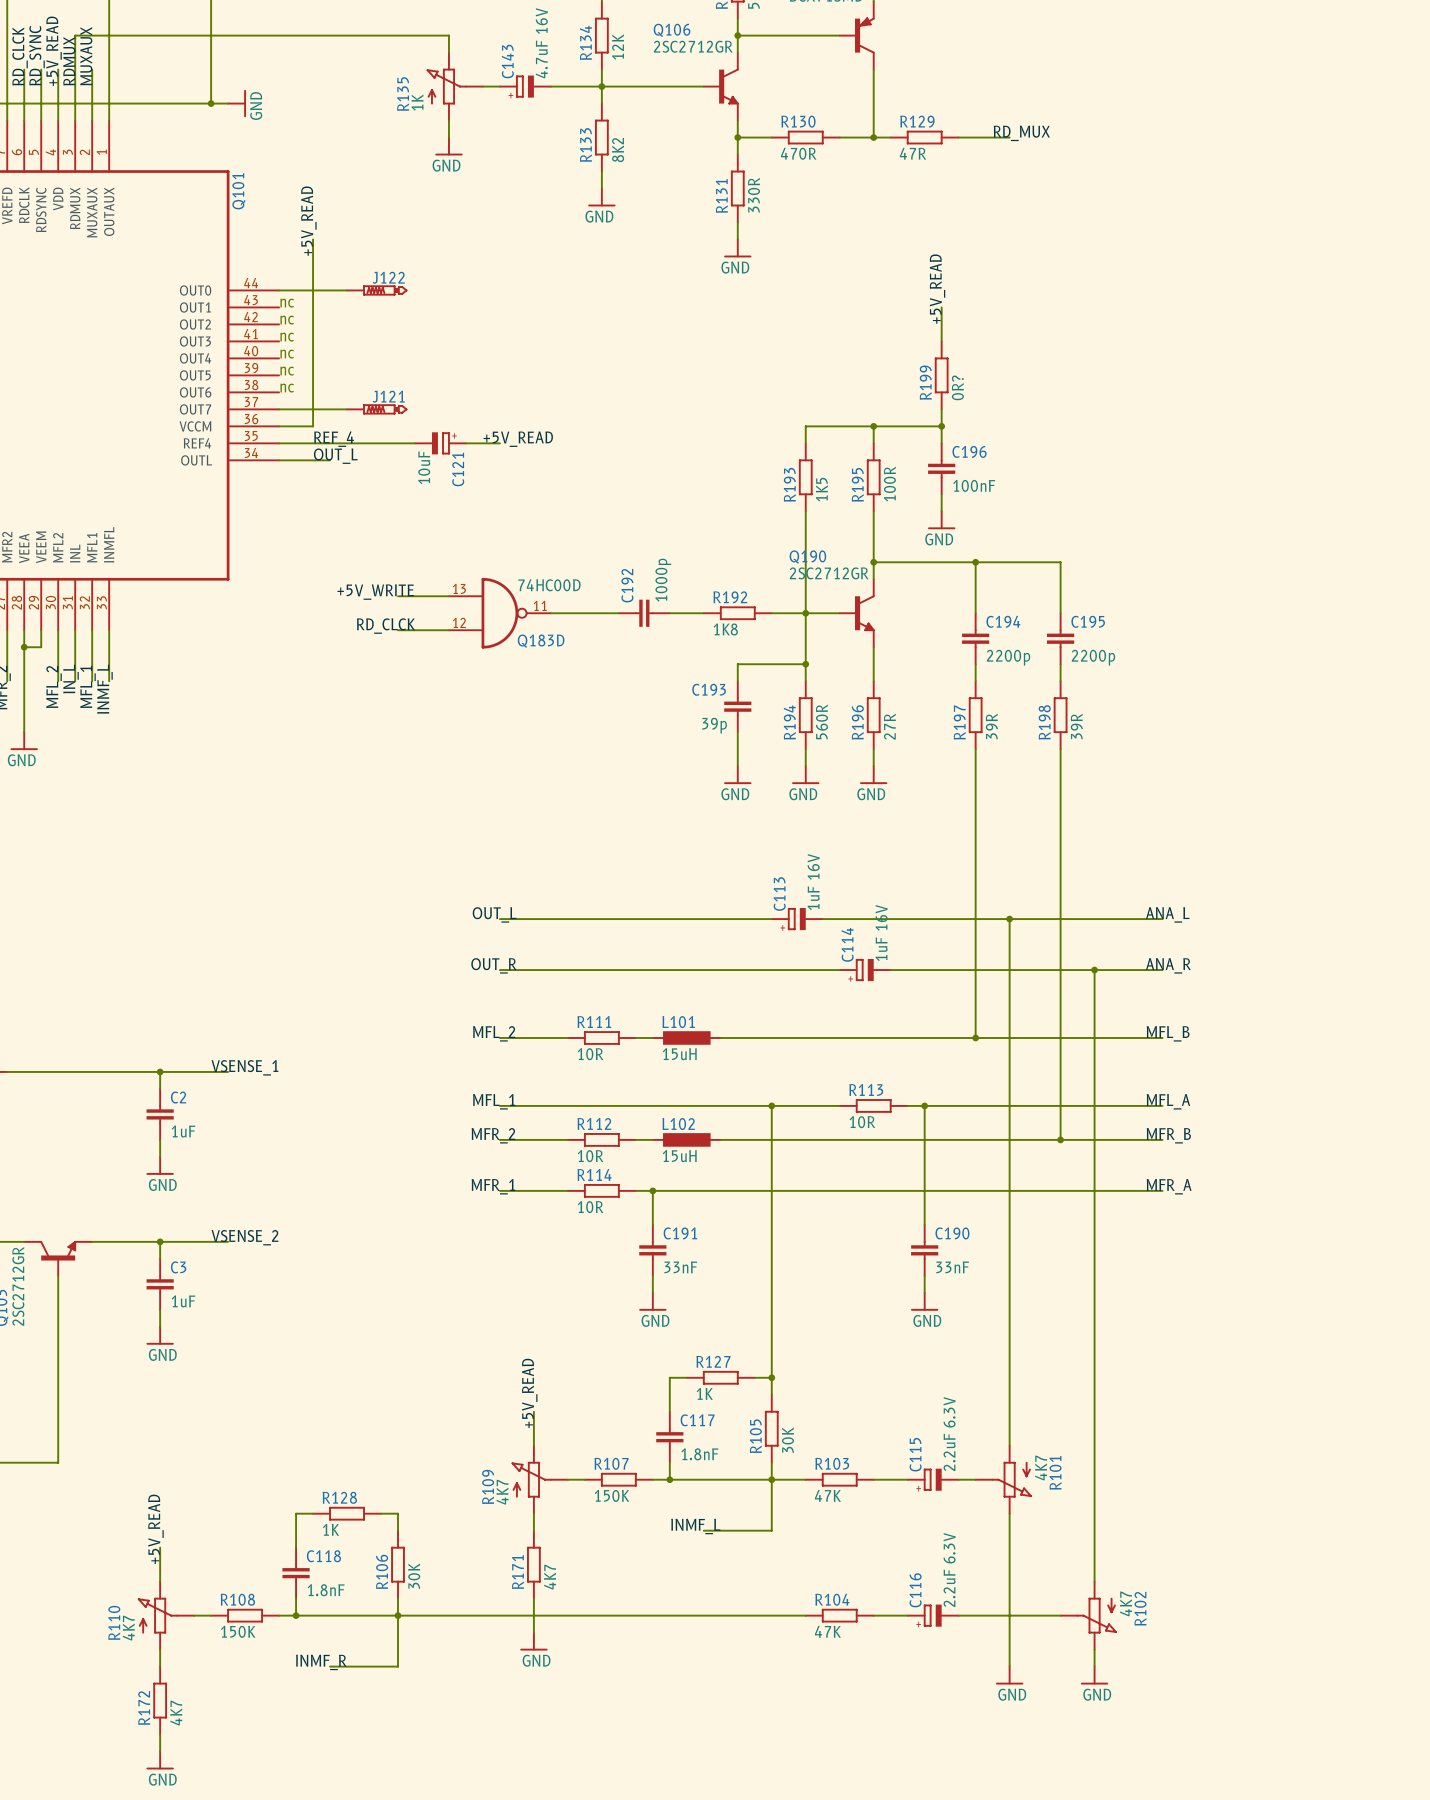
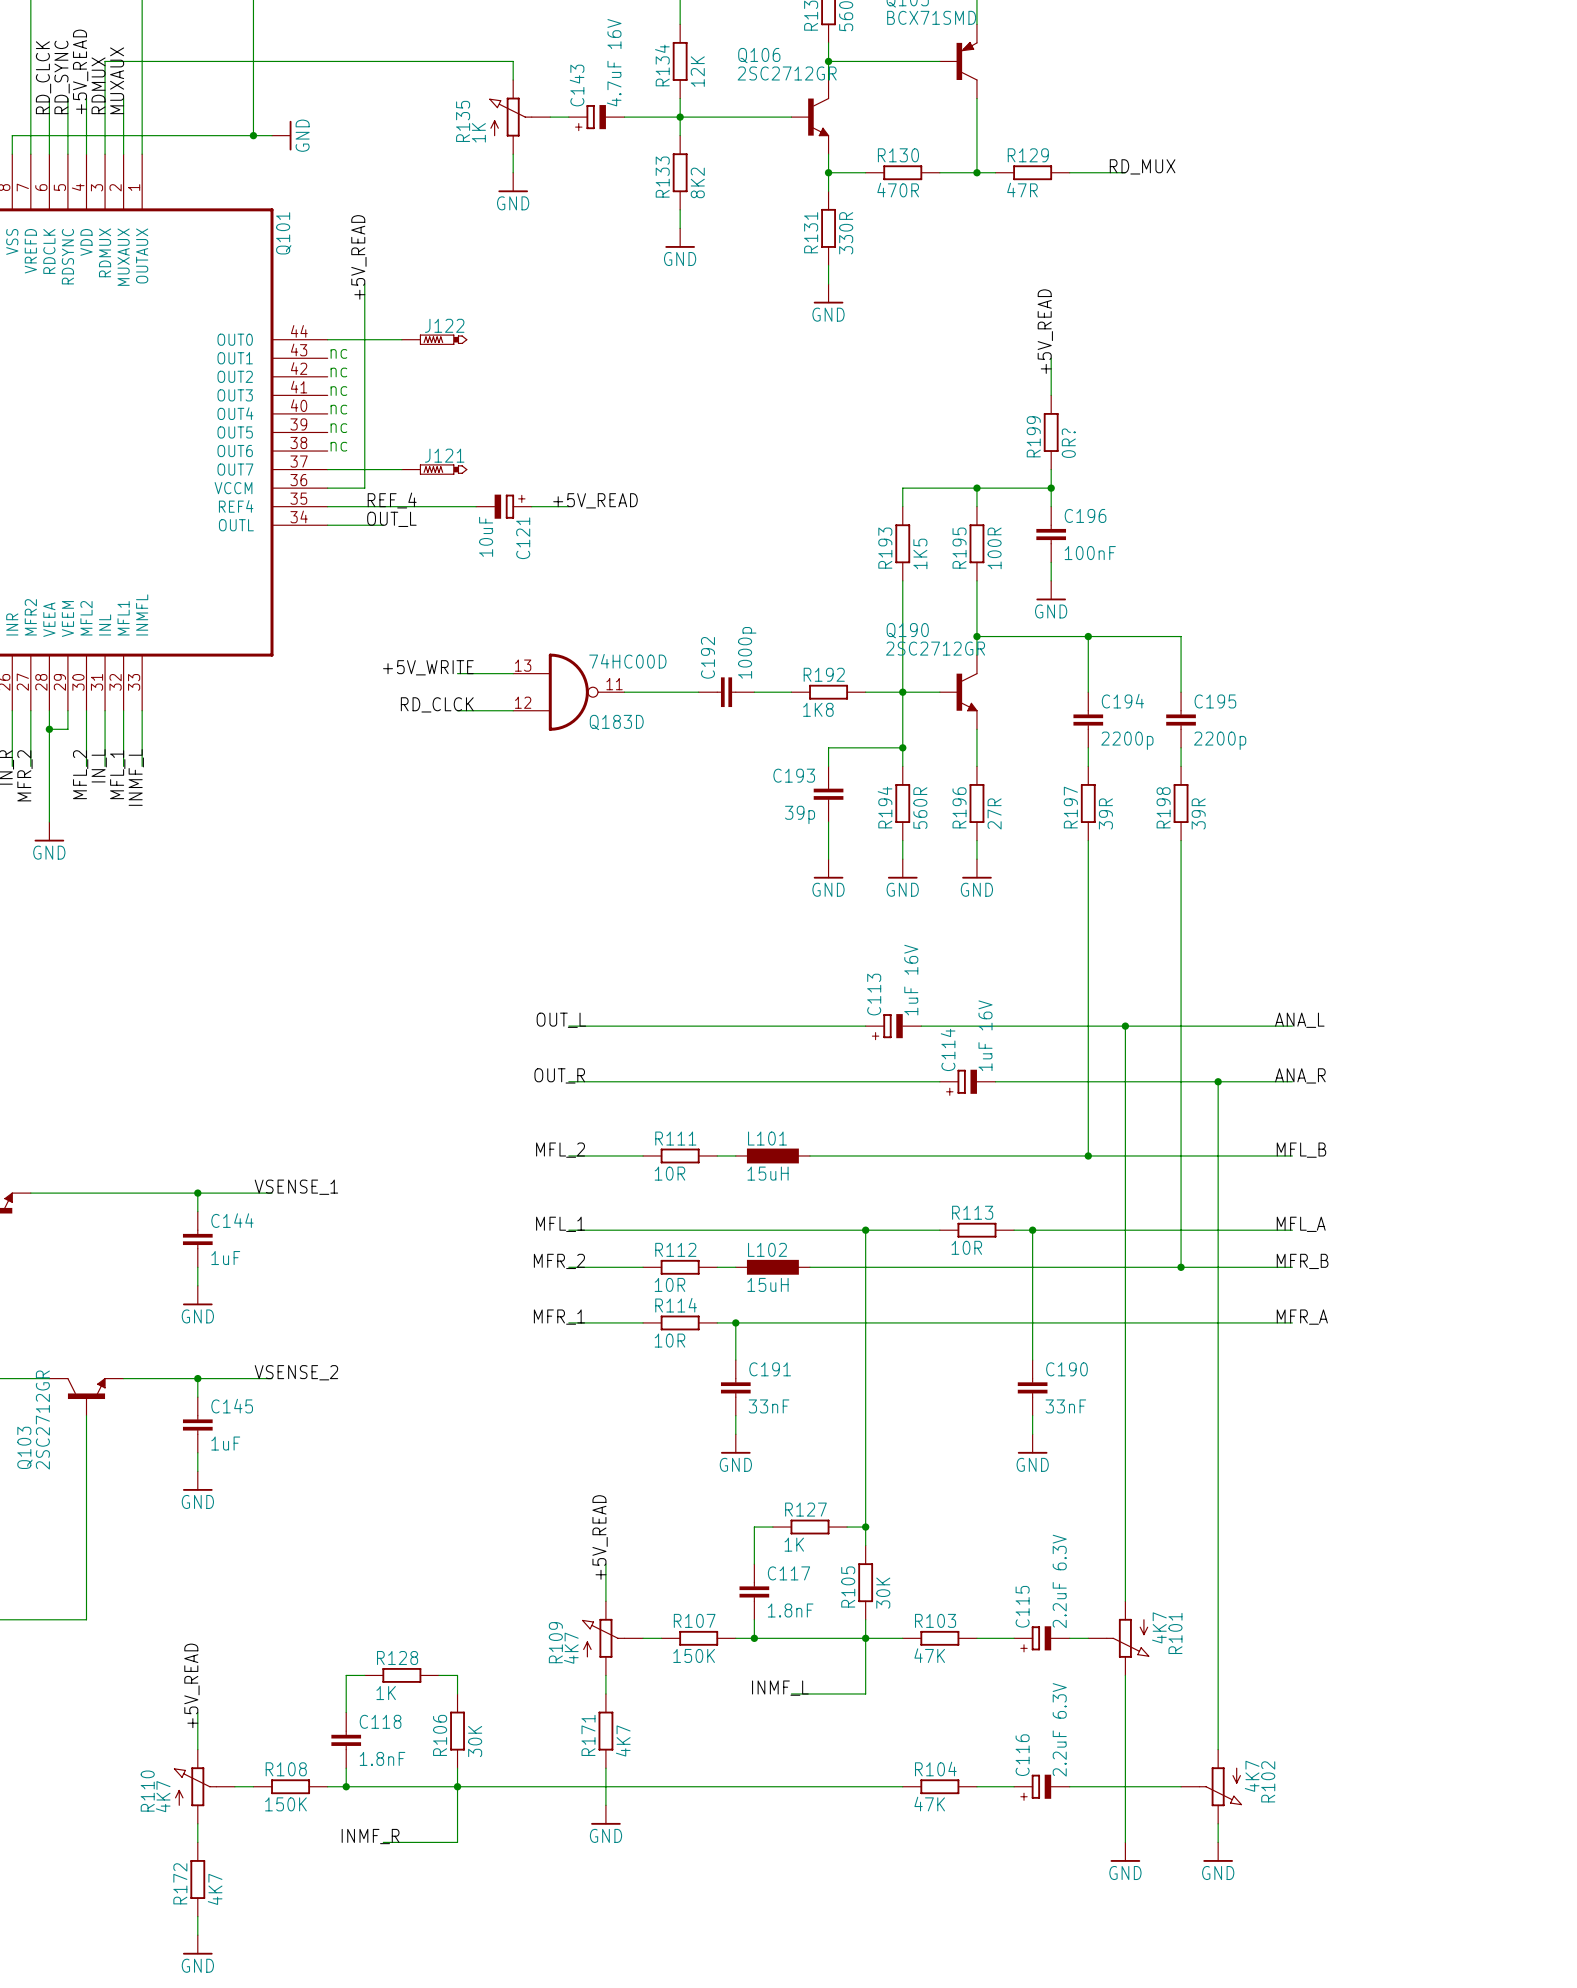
C2 name: C2 (178, 1097) -> C144 (232, 1220)
C3 name: C3 (178, 1267) -> C145 (232, 1406)

